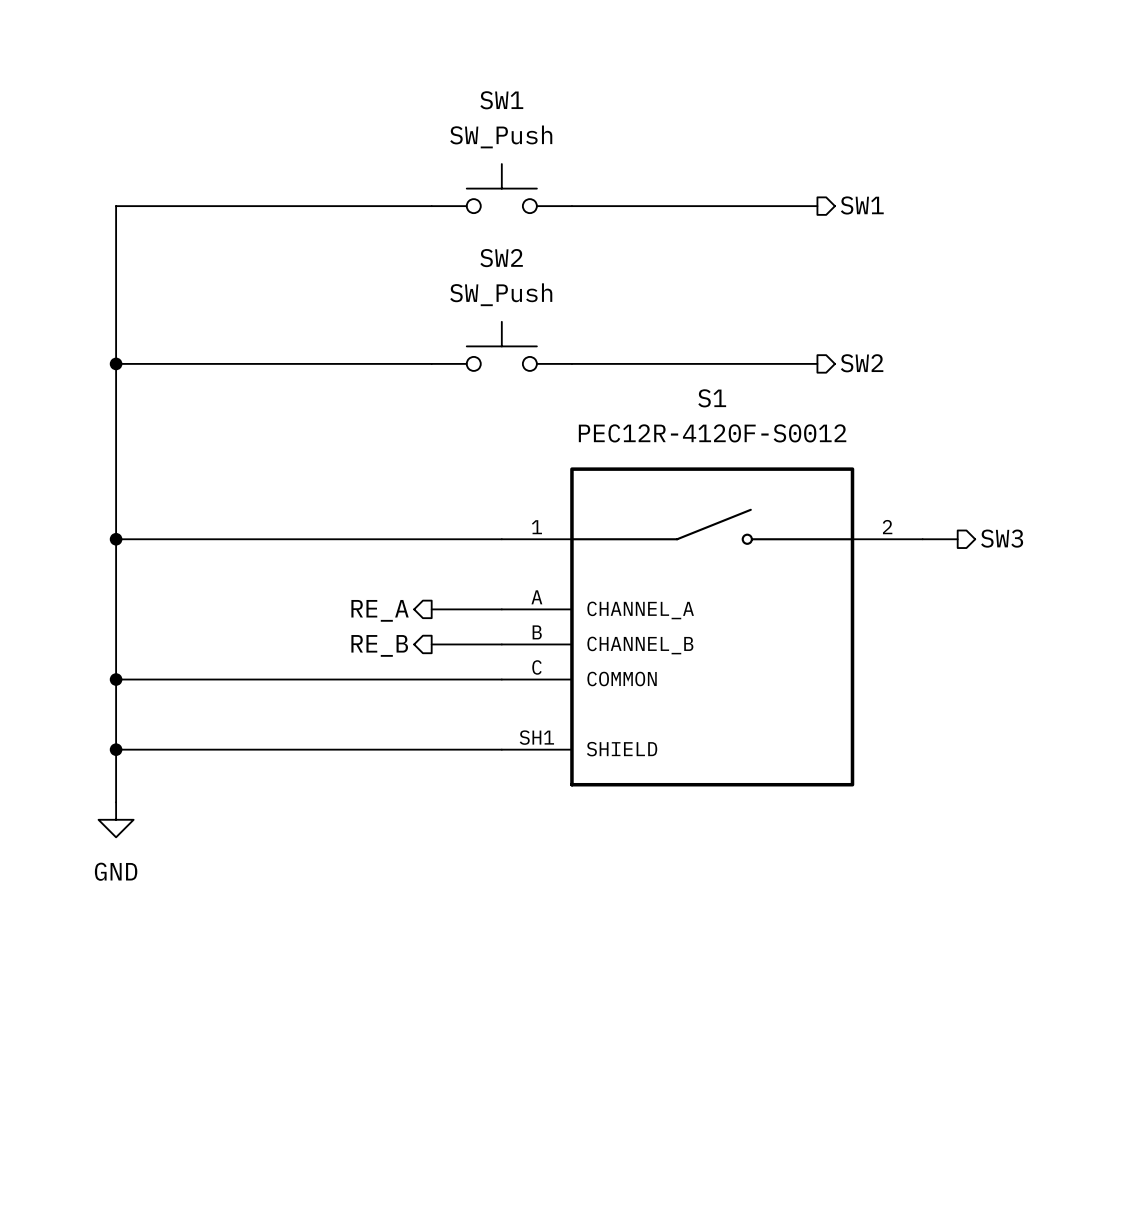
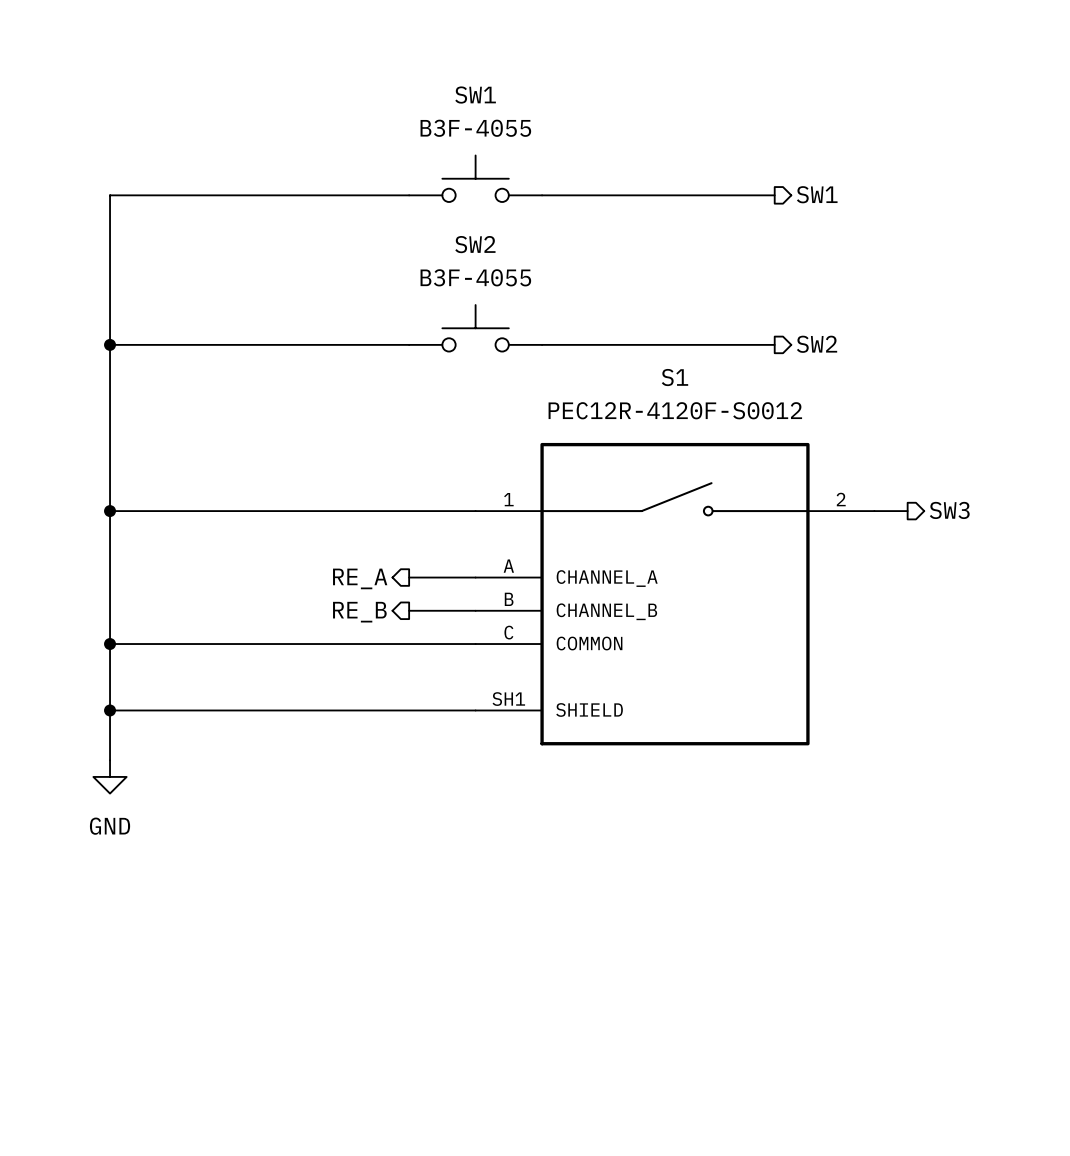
SW1 value: SW_Push (501, 136) -> B3F-4055 (475, 128)
SW2 value: SW_Push (501, 294) -> B3F-4055 (475, 277)

